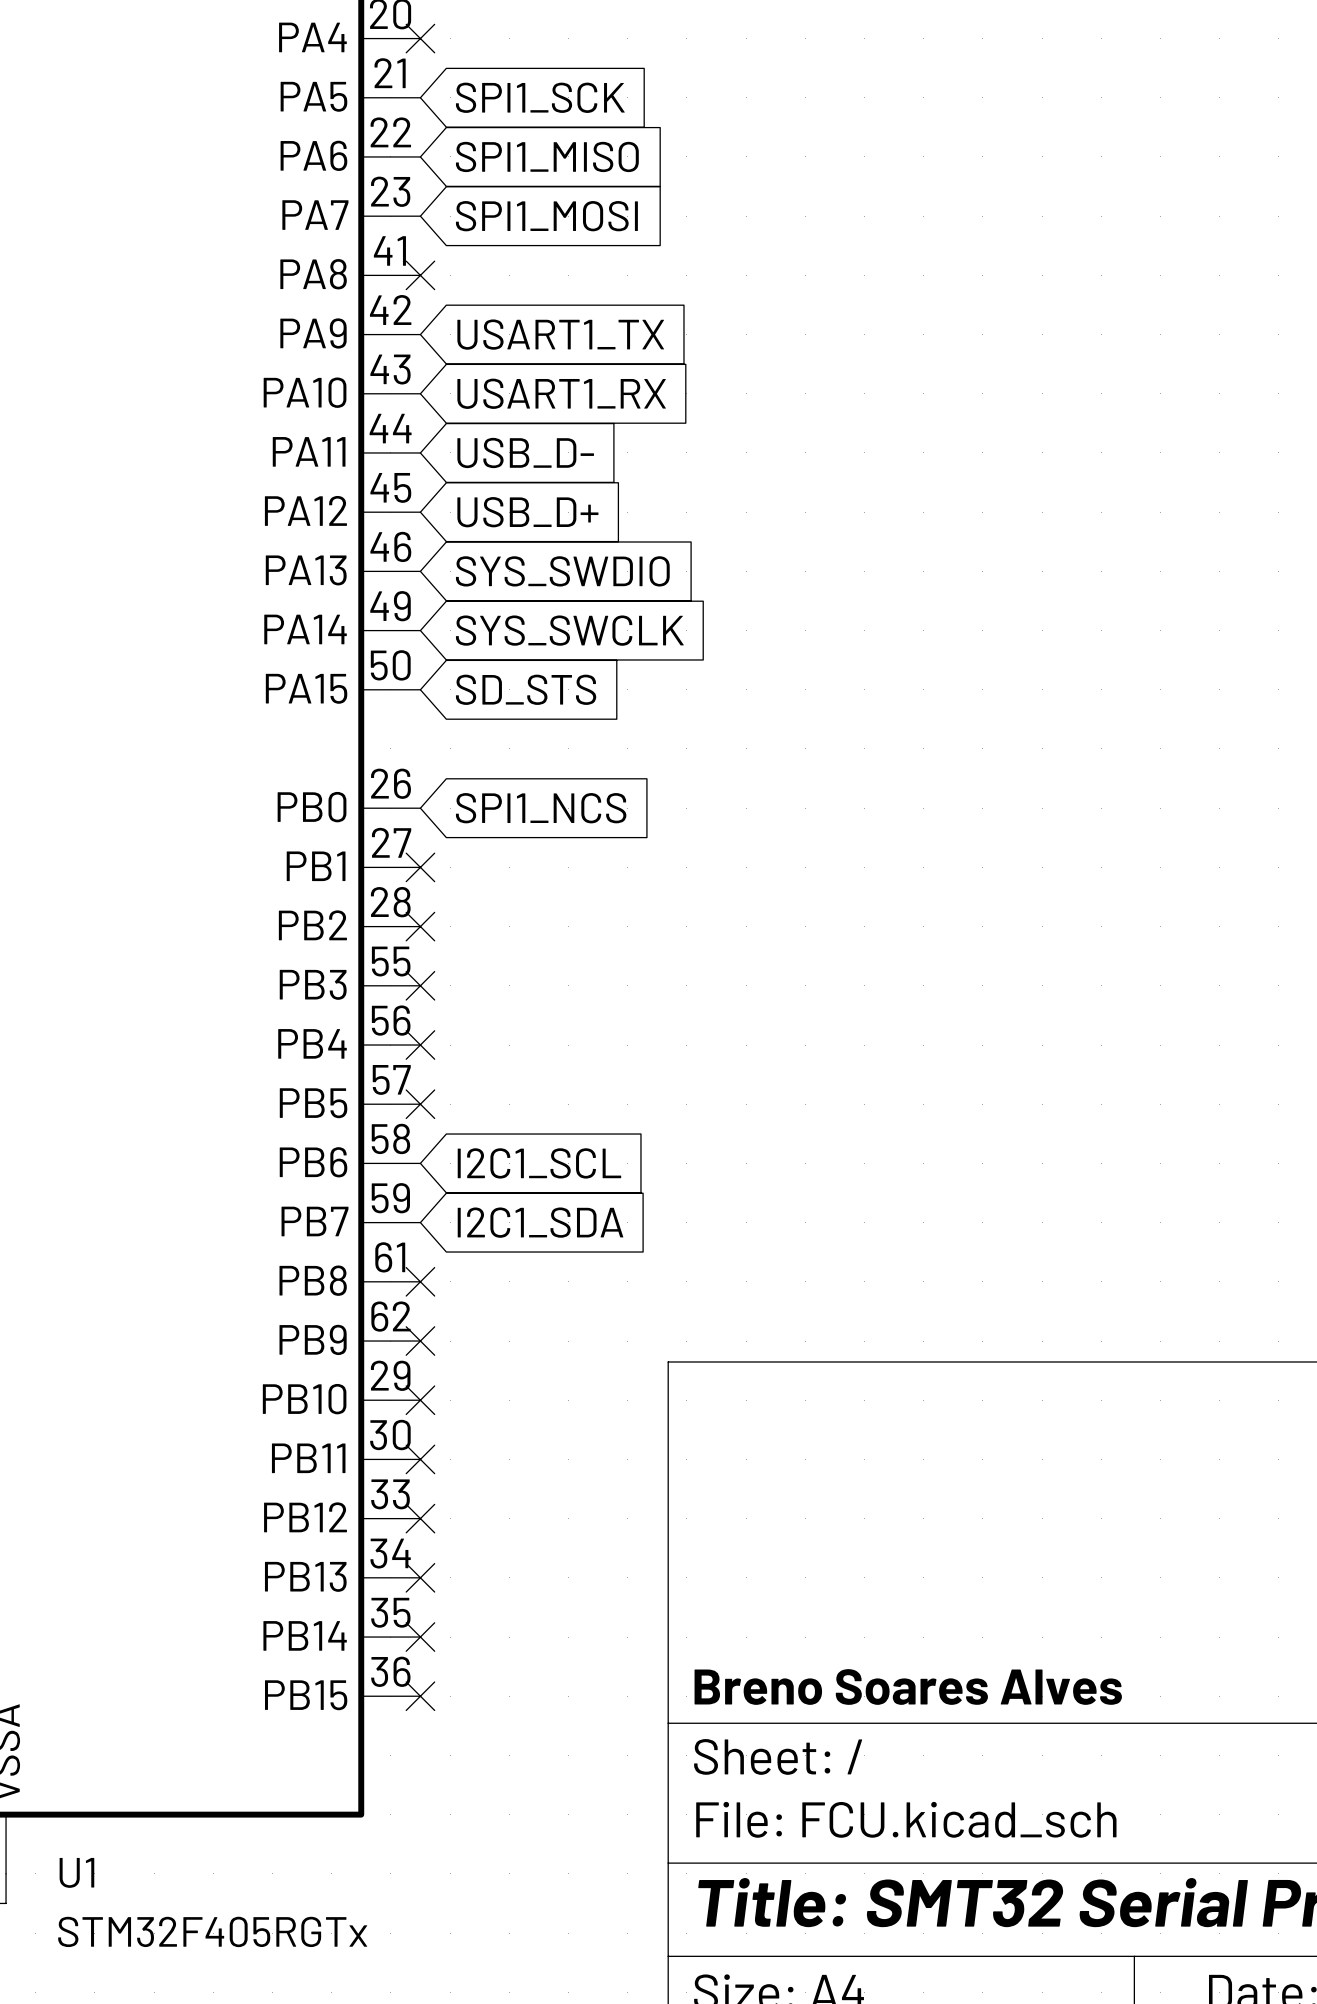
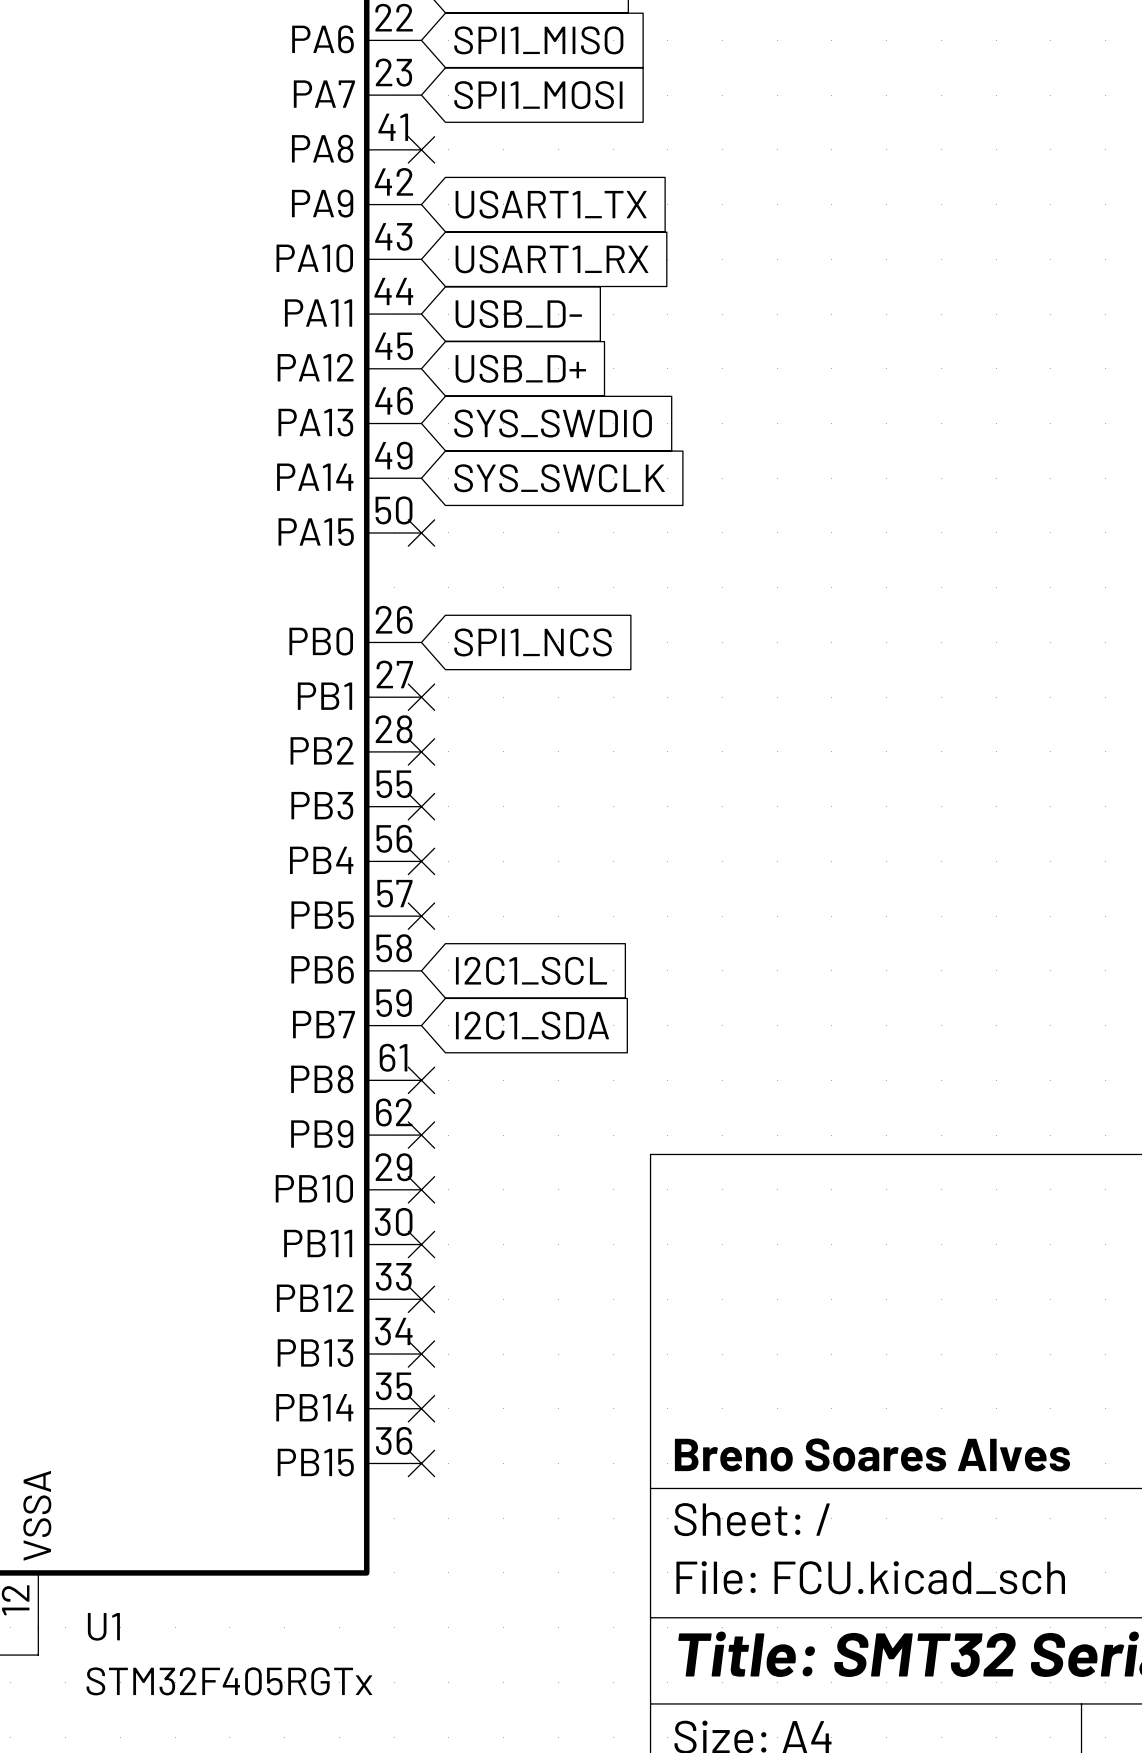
no-connect mark: none -> (421, 532)
global label: SD_STS (526, 689) -> none

